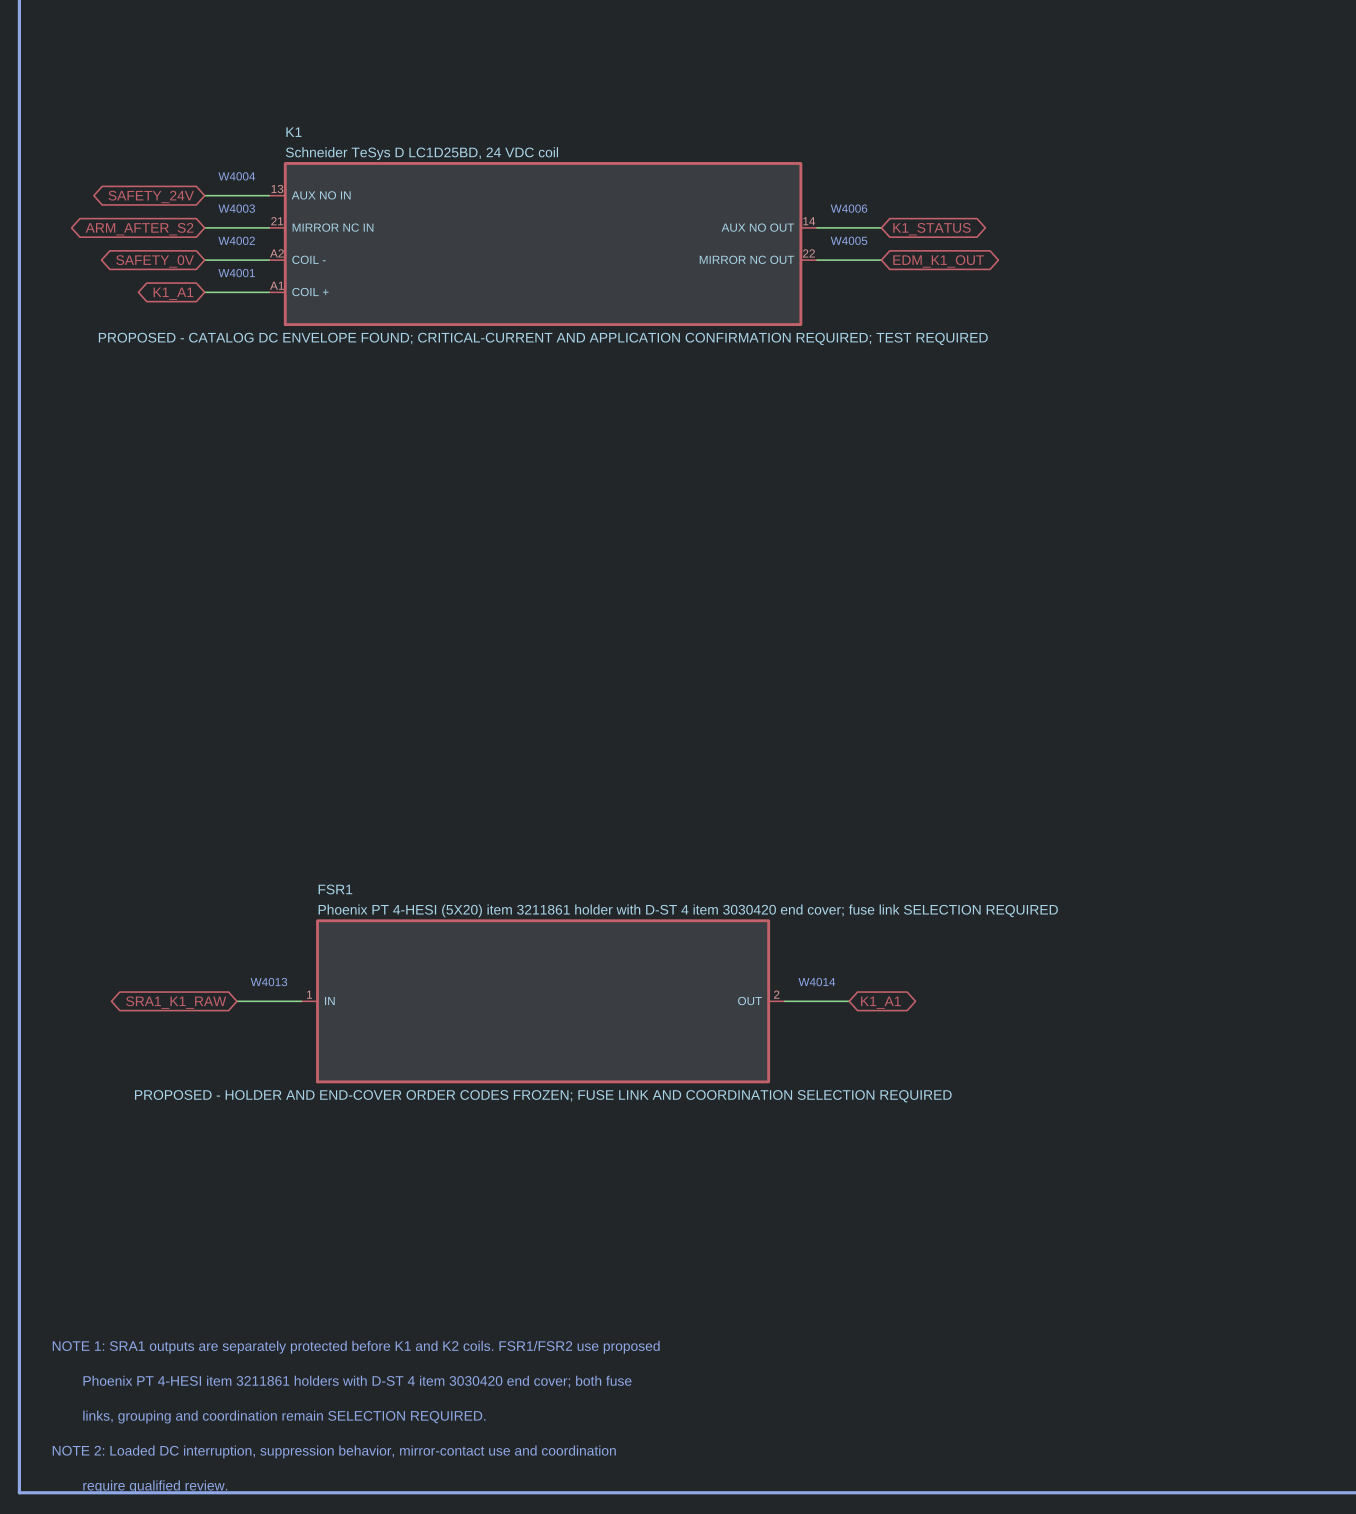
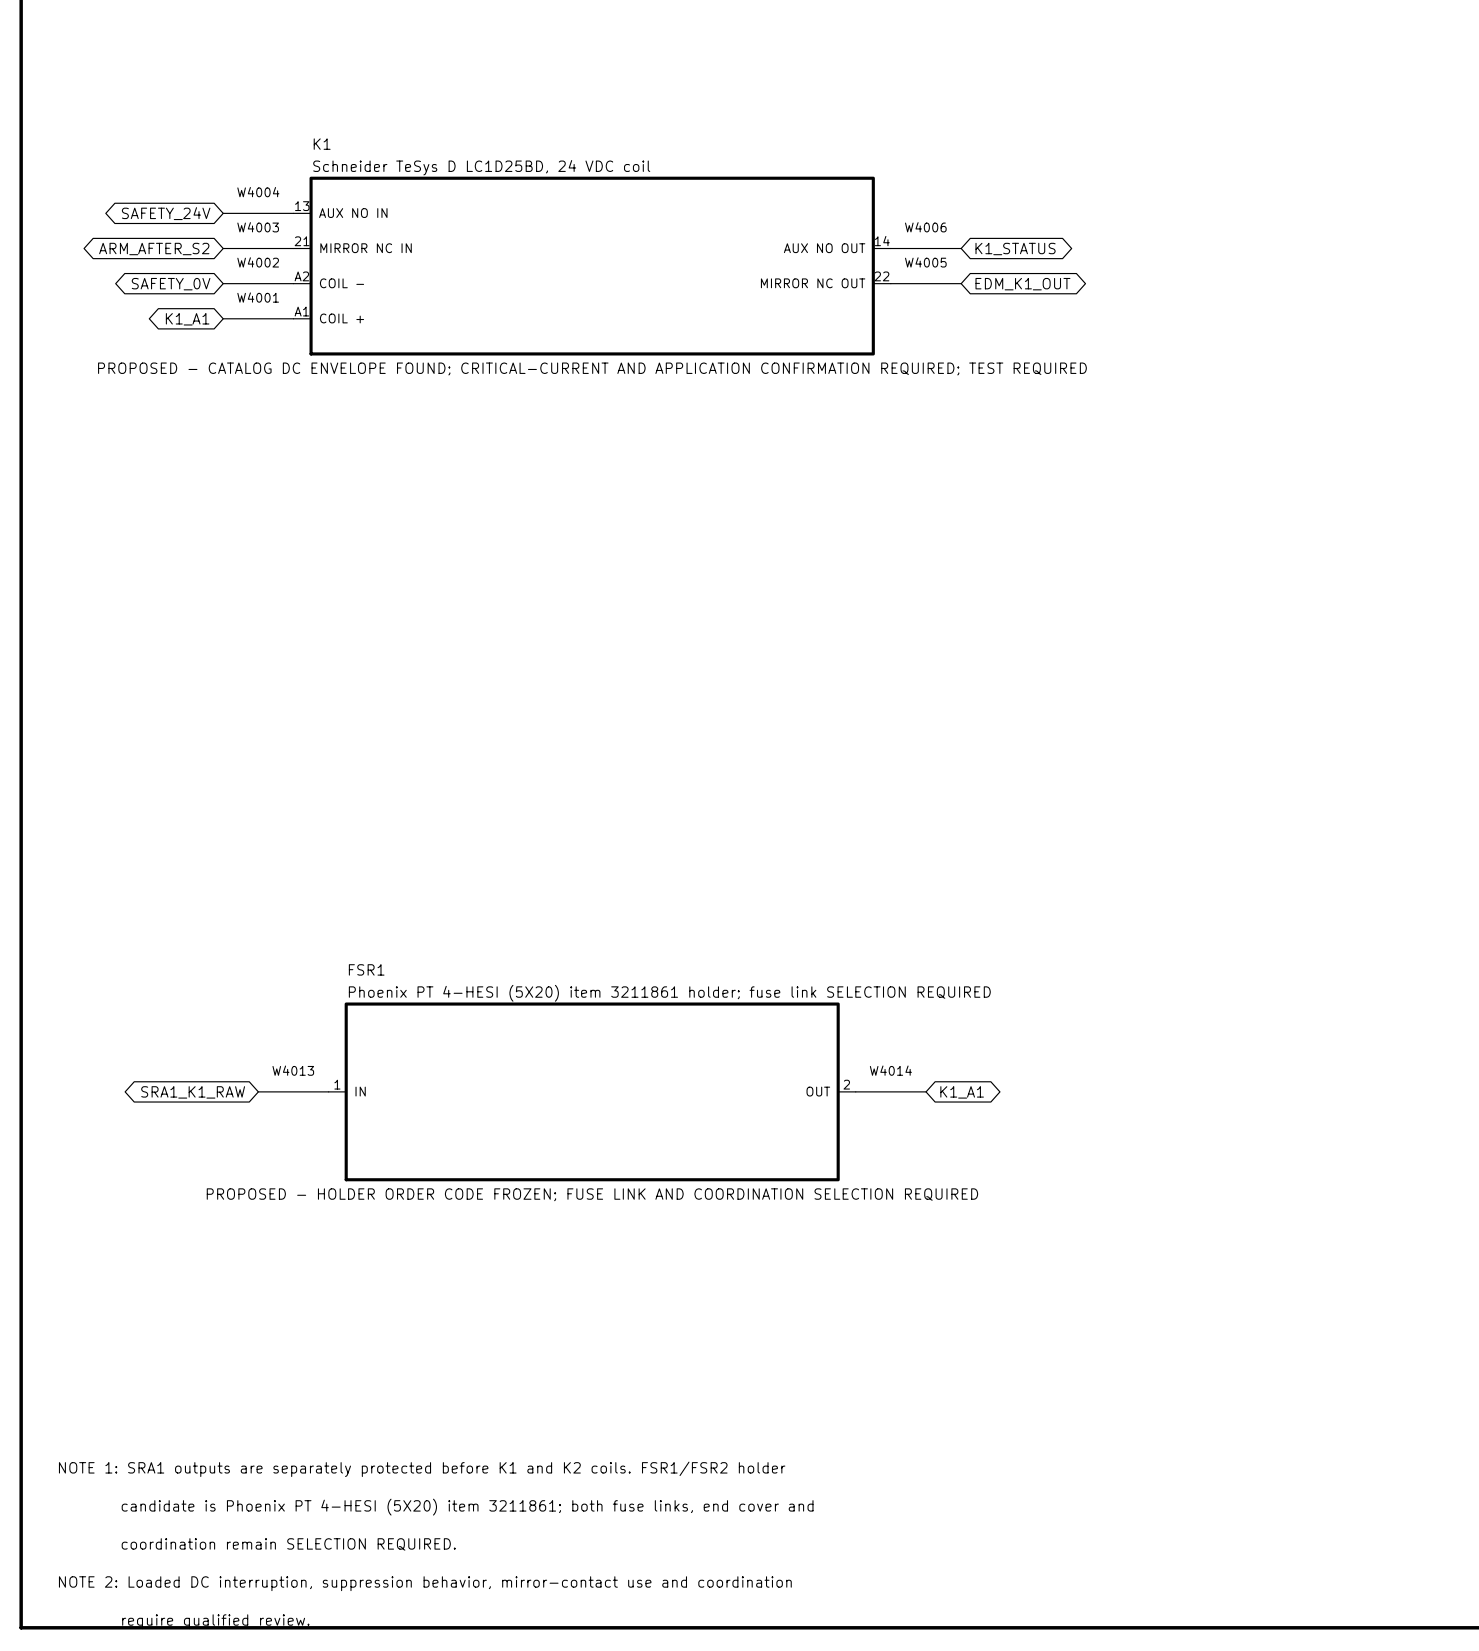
FSR1 text: Phoenix PT 4-HESI (5X20) item 3211861 holder with D-ST 4 item 3030420 end cover; fuse link SELECTION REQUIRED (688, 910) -> Phoenix PT 4-HESI (5X20) item 3211861 holder; fuse link SELECTION REQUIRED (669, 993)
FSR1 text: PROPOSED - HOLDER AND END-COVER ORDER CODES FROZEN; FUSE LINK AND COORDINATION SELECTION REQUIRED (543, 1096) -> PROPOSED - HOLDER ORDER CODE FROZEN; FUSE LINK AND COORDINATION SELECTION REQUIRED (592, 1194)
text: NOTE 1: SRA1 outputs are separately protected before K1 and K2 coils. FSR1/FSR2 use proposed (356, 1347) -> NOTE 1: SRA1 outputs are separately protected before K1 and K2 coils. FSR1/FSR2 holder (422, 1469)
text: Phoenix PT 4-HESI item 3211861 holders with D-ST 4 item 3030420 end cover; both fuse (357, 1381) -> candidate is Phoenix PT 4-HESI (5X20) item 3211861; both fuse links, end cover and (467, 1507)
text: links, grouping and coordination remain SELECTION REQUIRED. (284, 1417) -> coordination remain SELECTION REQUIRED. (288, 1544)

